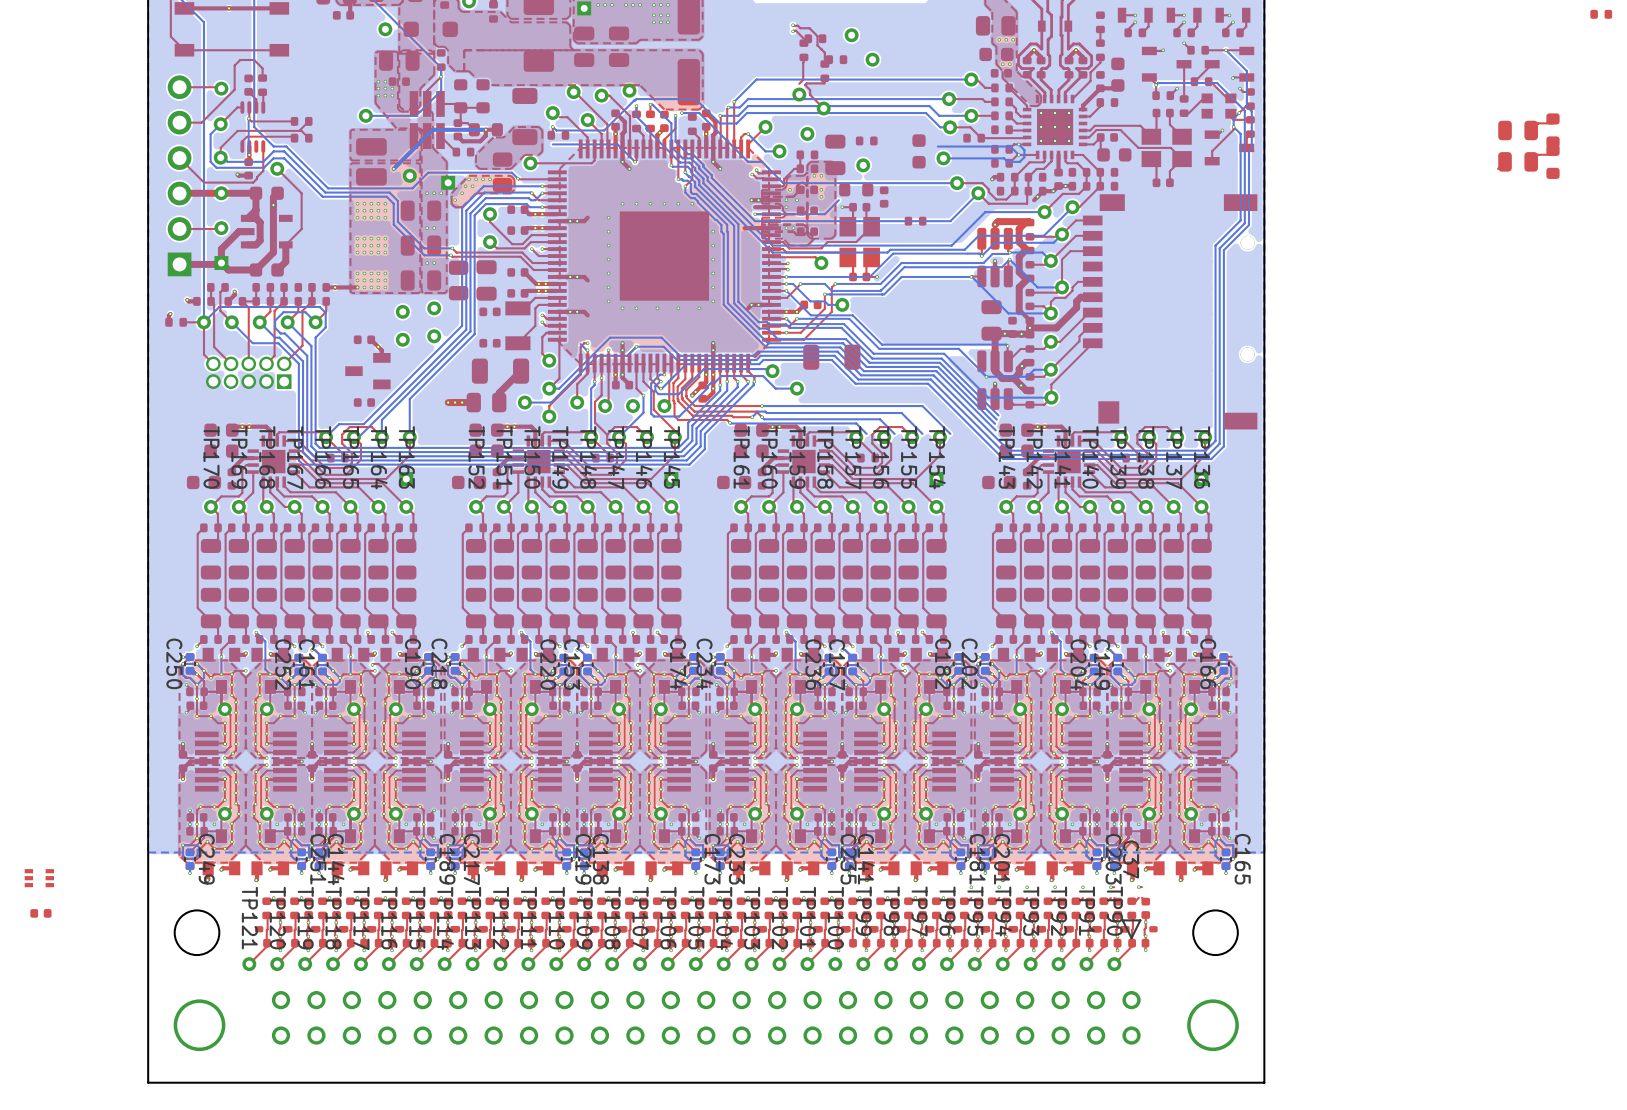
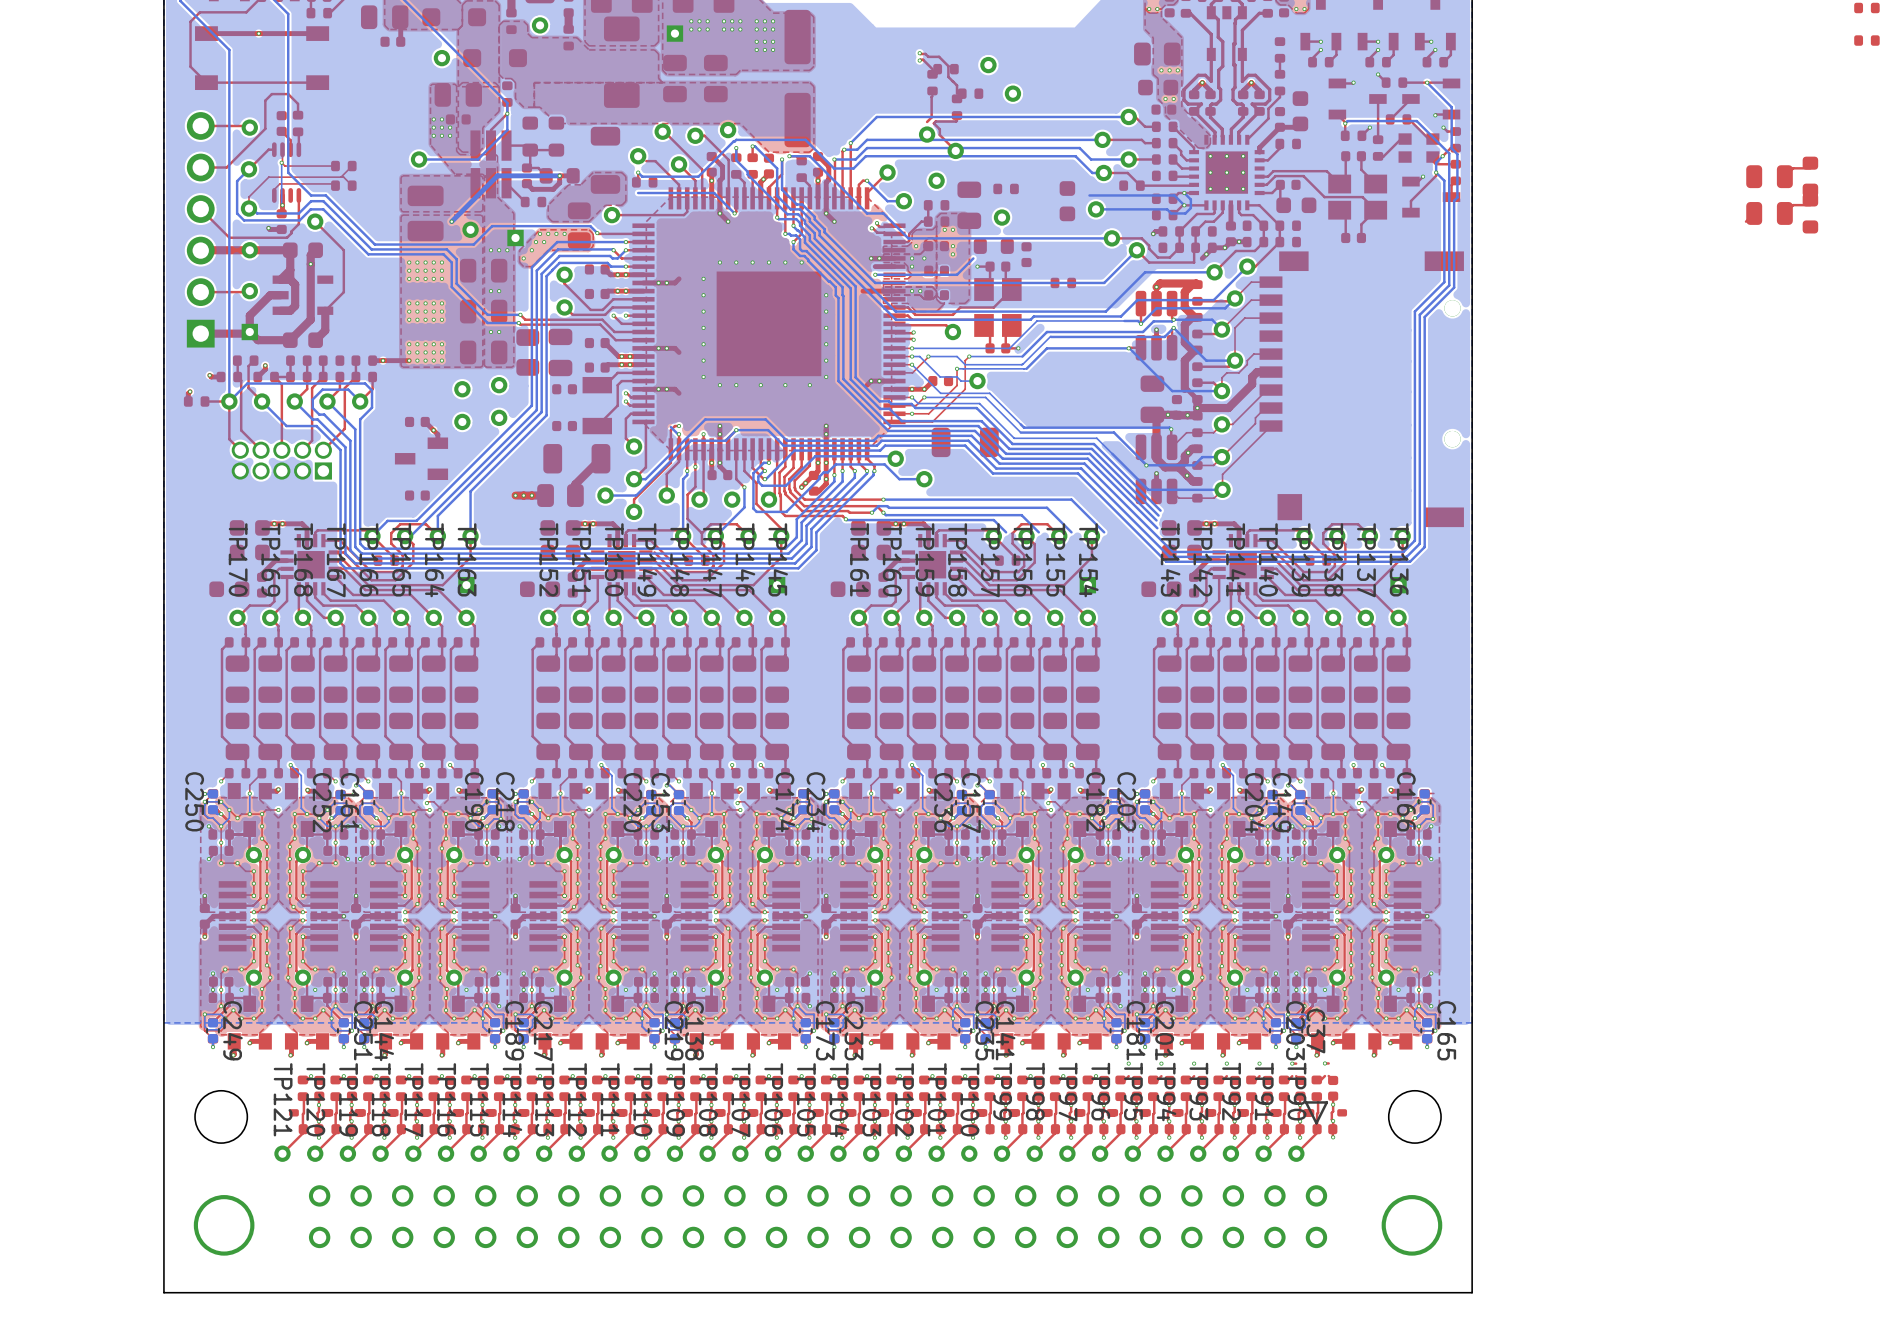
part: (39, 878) -> none
part: (40, 913) -> none

